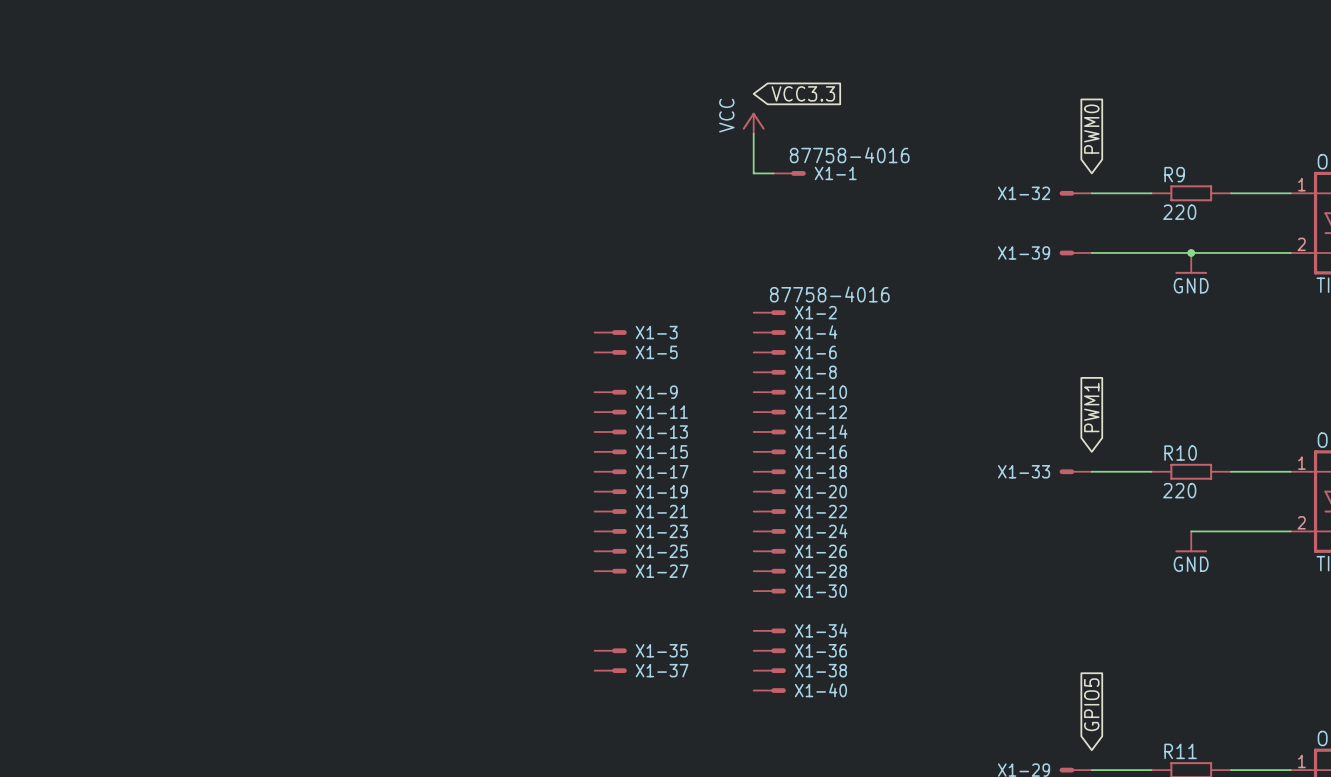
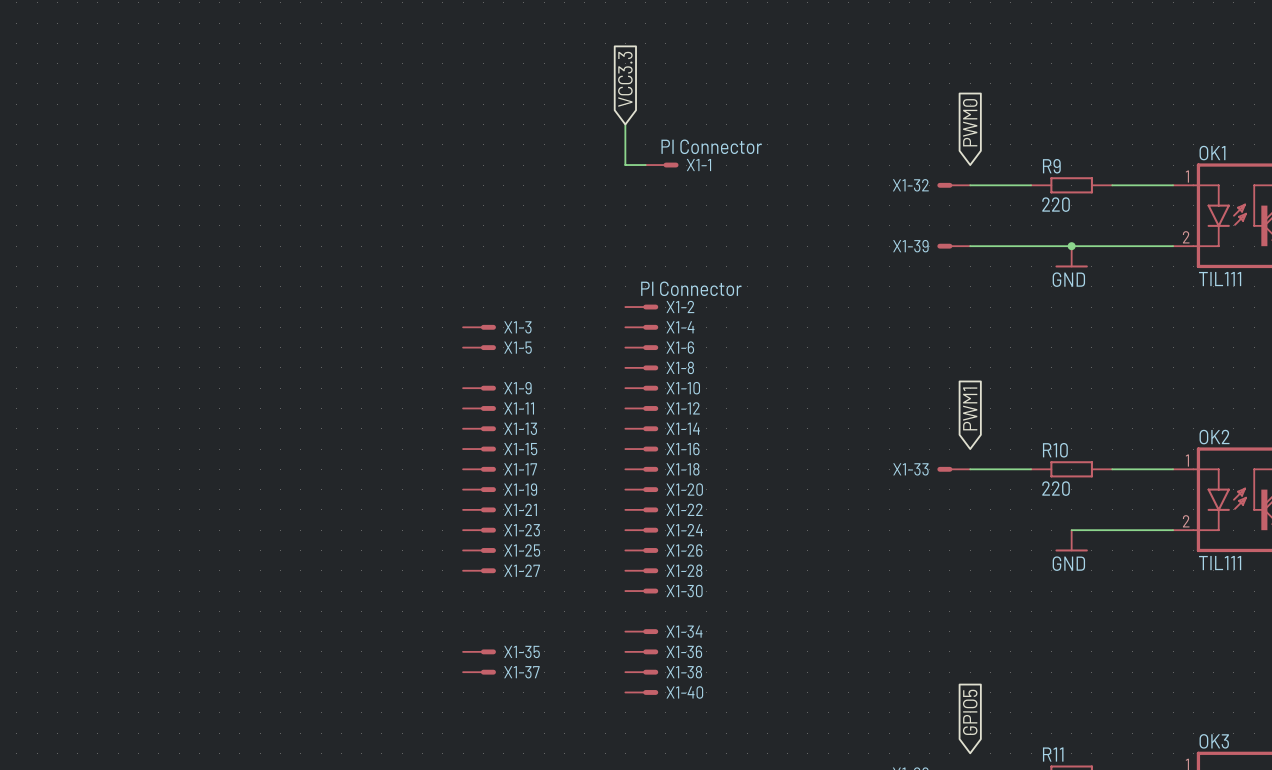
global label rotation: 0° (803, 93) -> 90° counterclockwise (625, 79)
power symbol: VCC (753, 123) -> none
X1-1 value: 87758-4016 (849, 155) -> PI Connector (711, 146)
X1-2 value: 87758-4016 (829, 294) -> PI Connector (691, 288)

